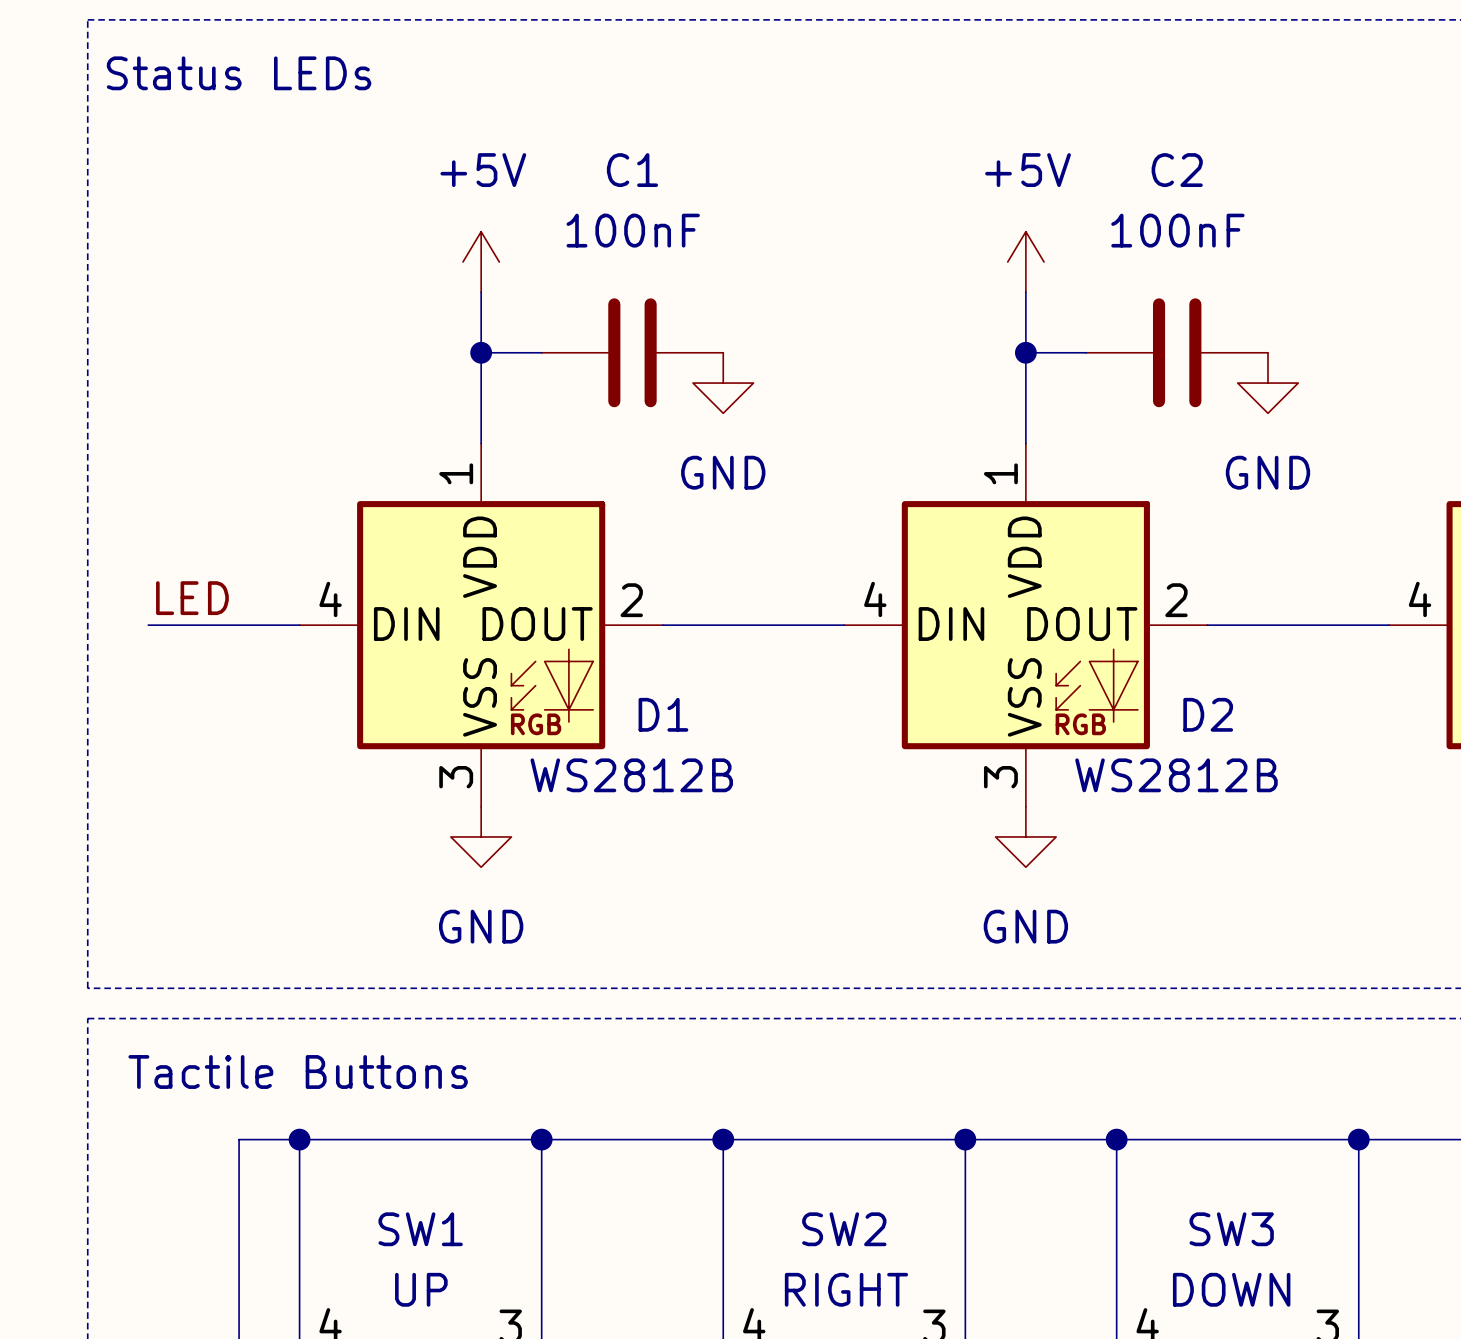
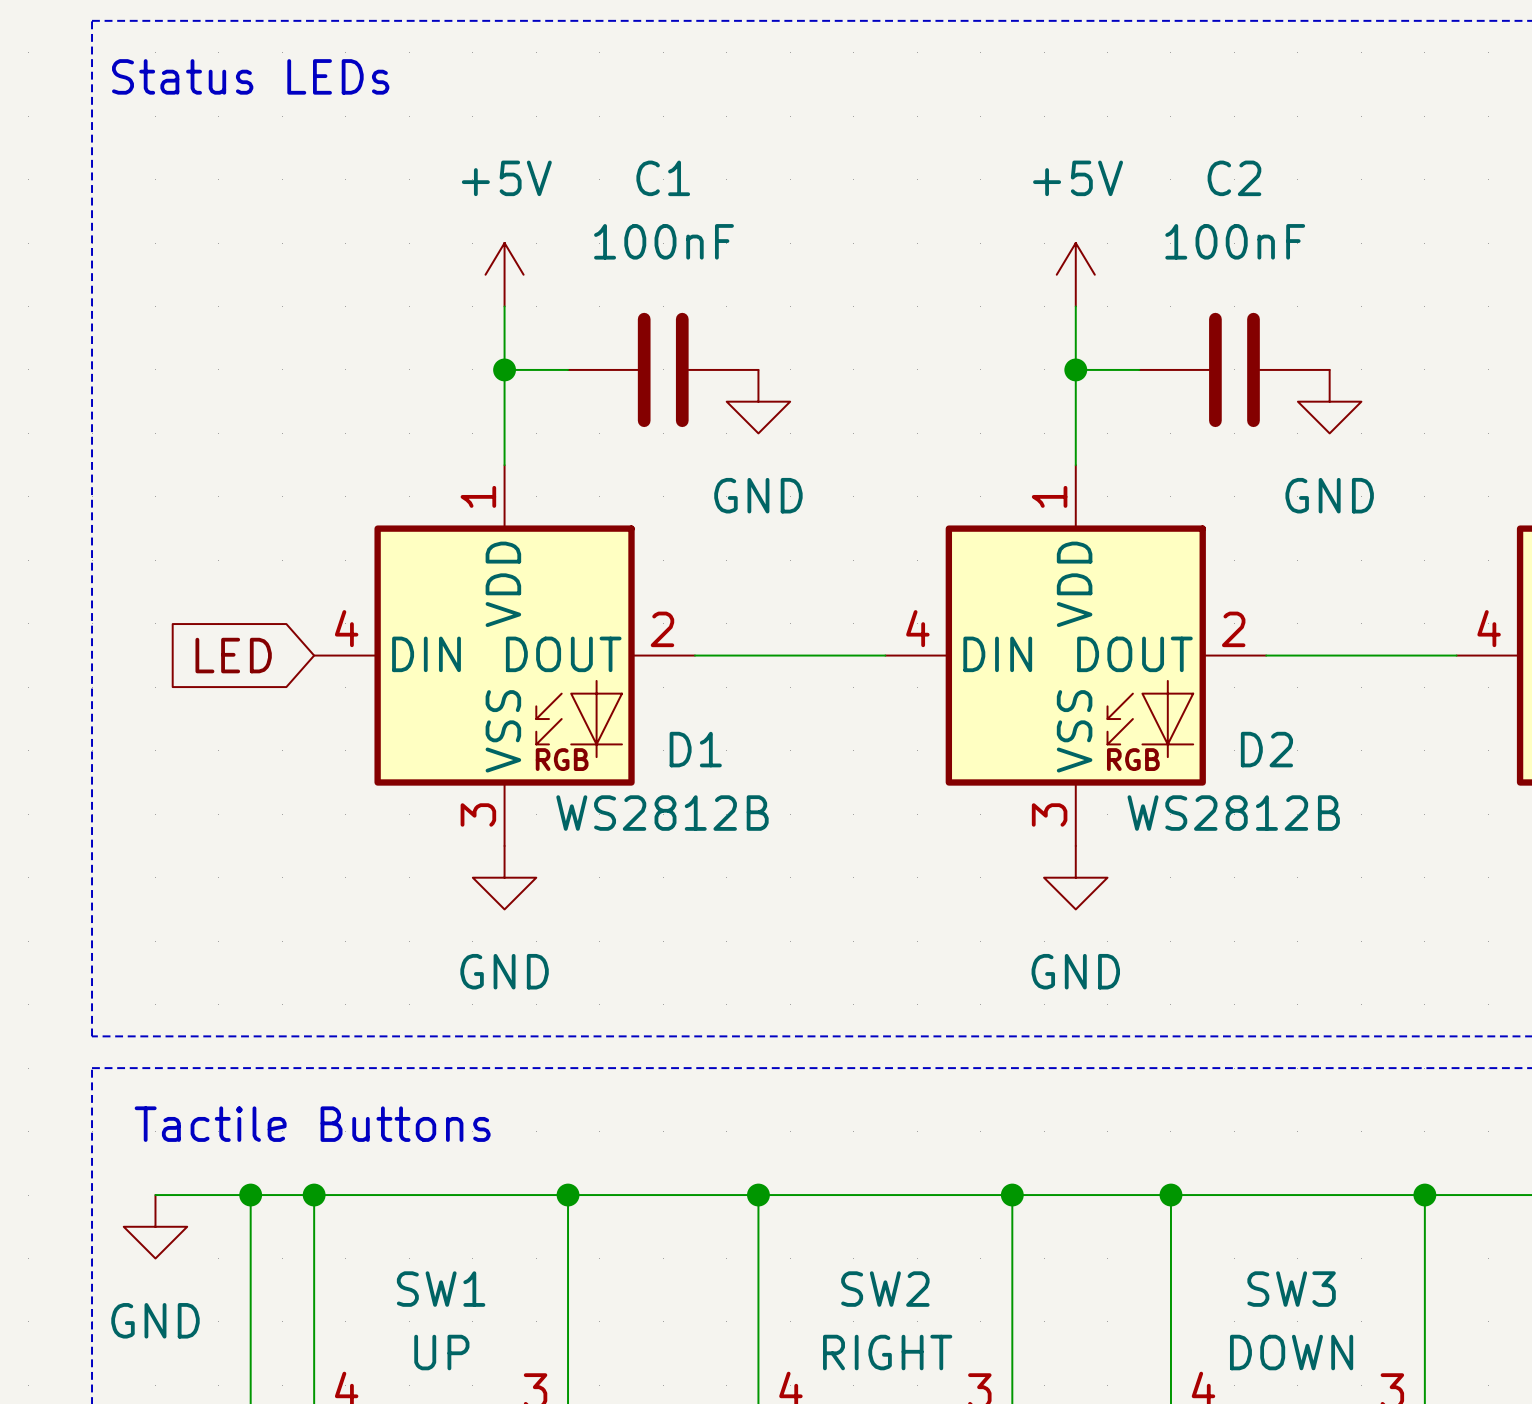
label: LED (192, 598) -> none
wire: (148, 625) (299, 625) -> none
global label: none -> LED (233, 655)
wire: none -> (155, 1195) (250, 1195)
junction: none -> (250, 1195)
power symbol: none -> GND (155, 1226)

